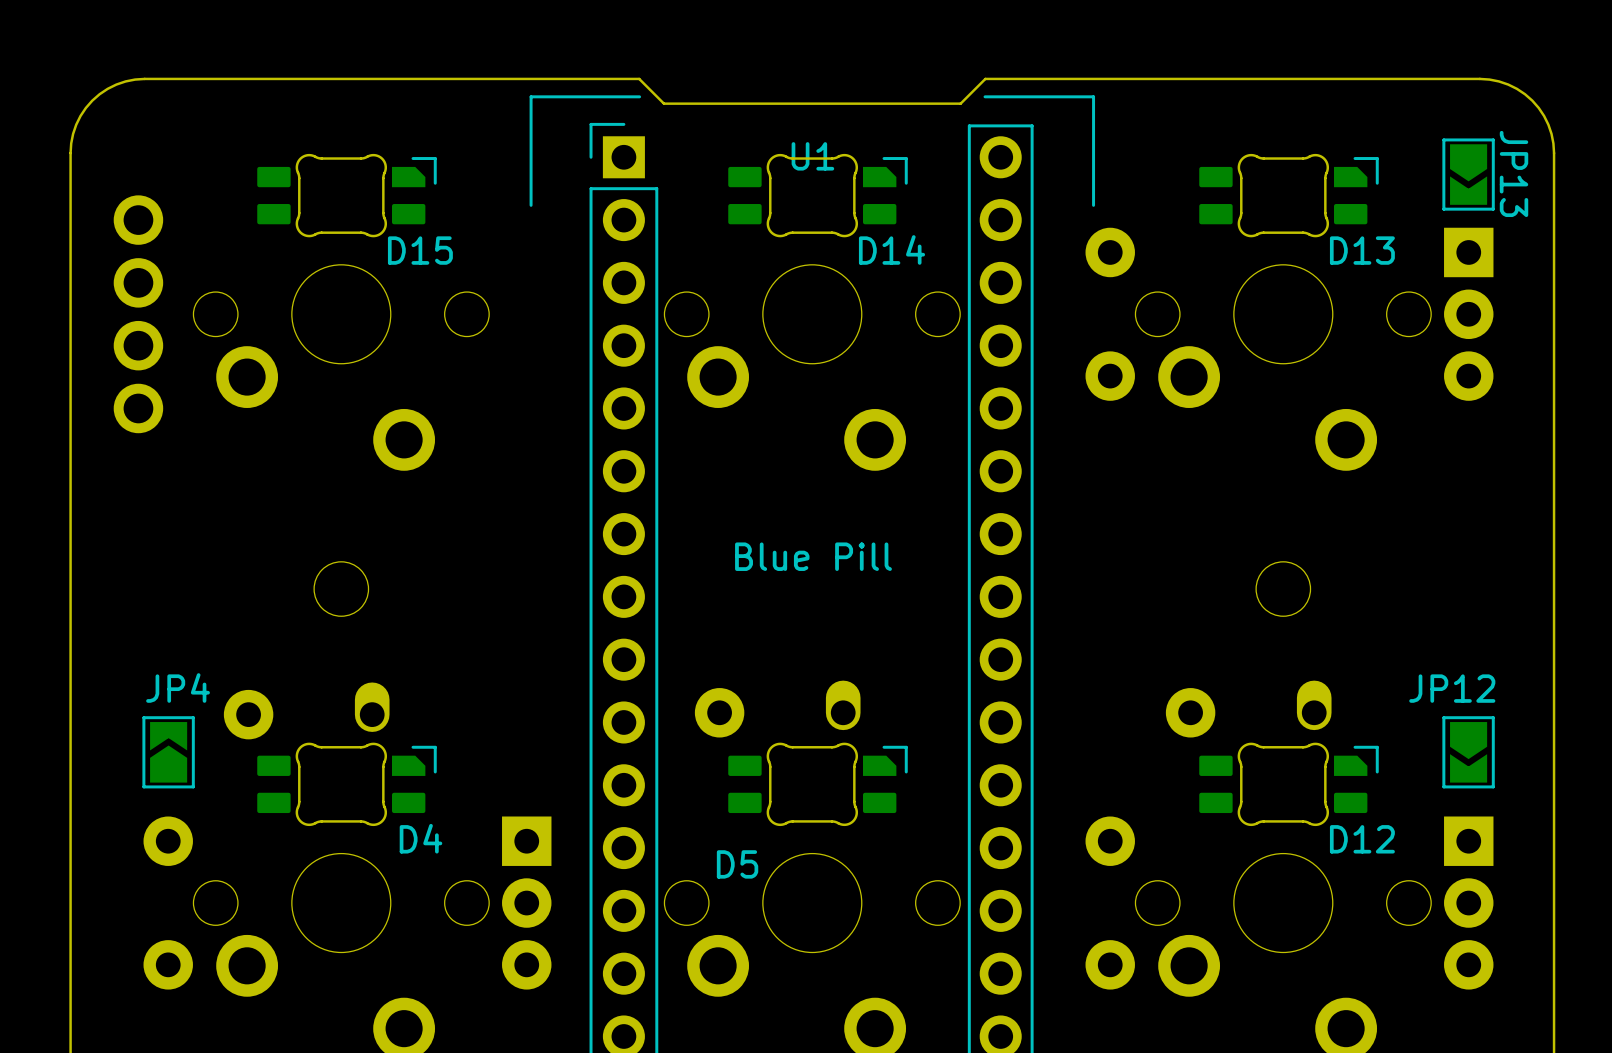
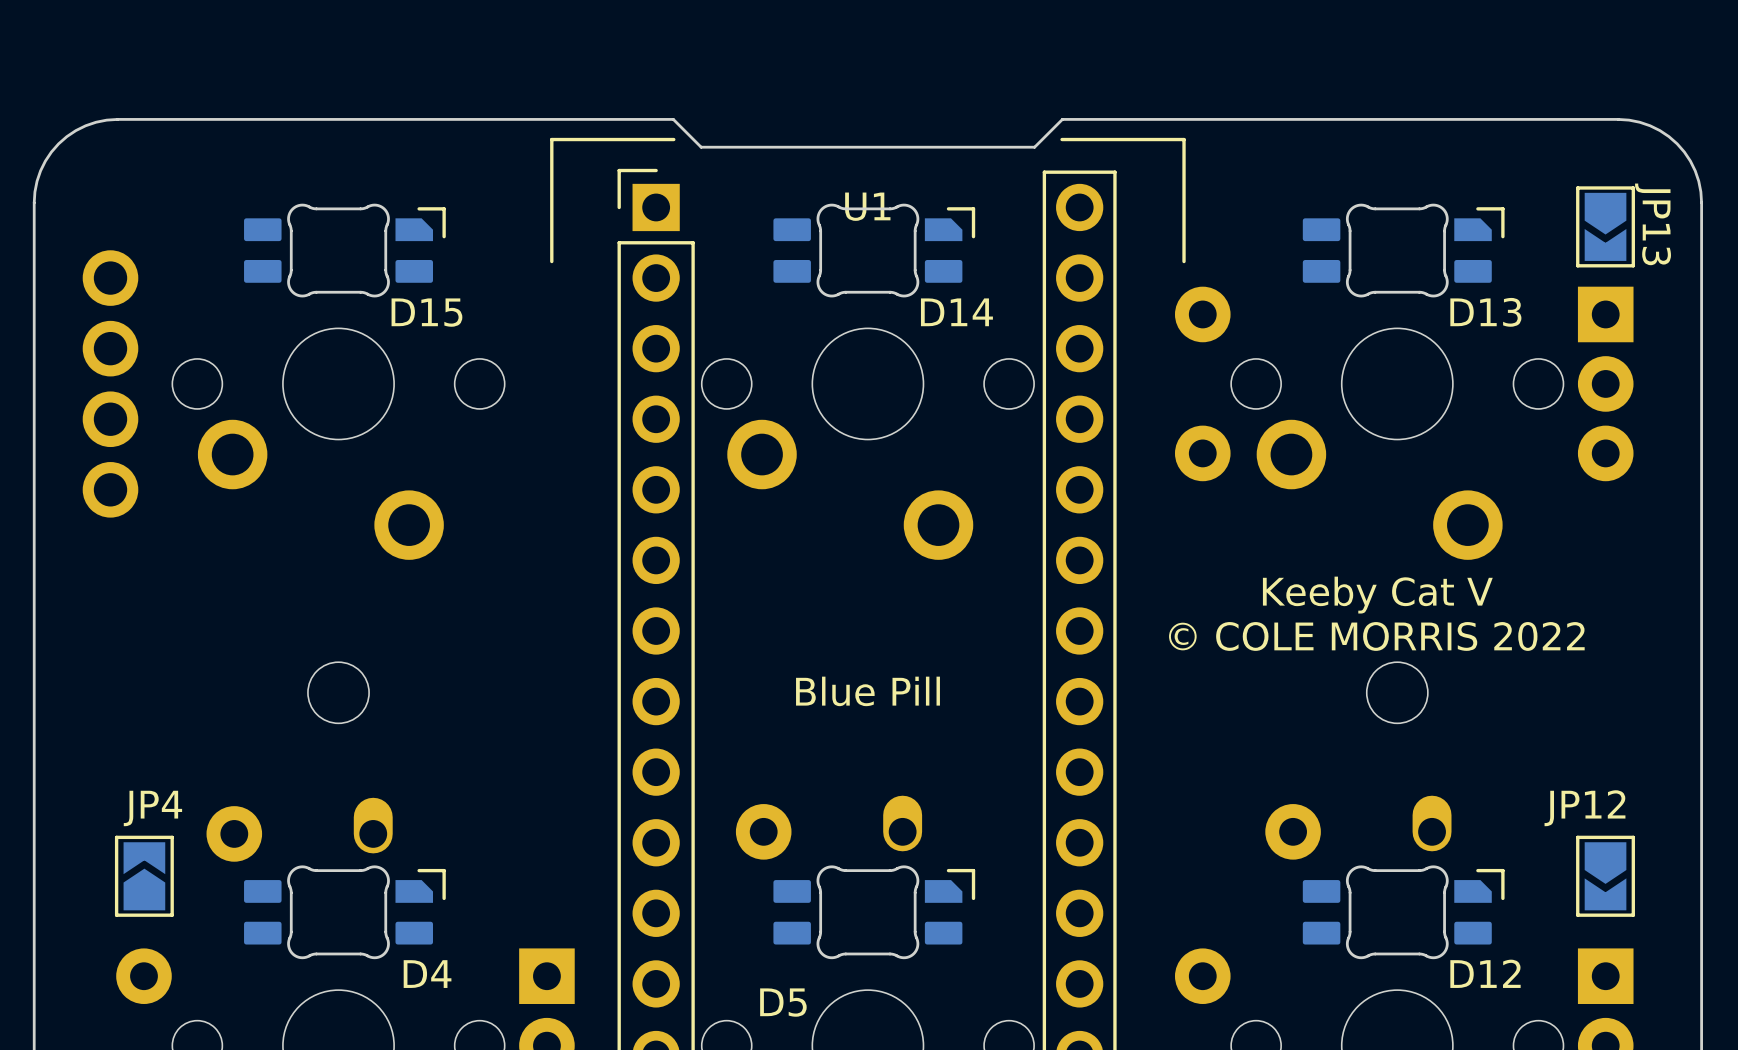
text: none -> Keeby Cat V (1377, 595)
text: none -> © COLE MORRIS 2022 (1376, 636)
text position: Blue Pill (813, 556) -> Blue Pill (867, 691)

